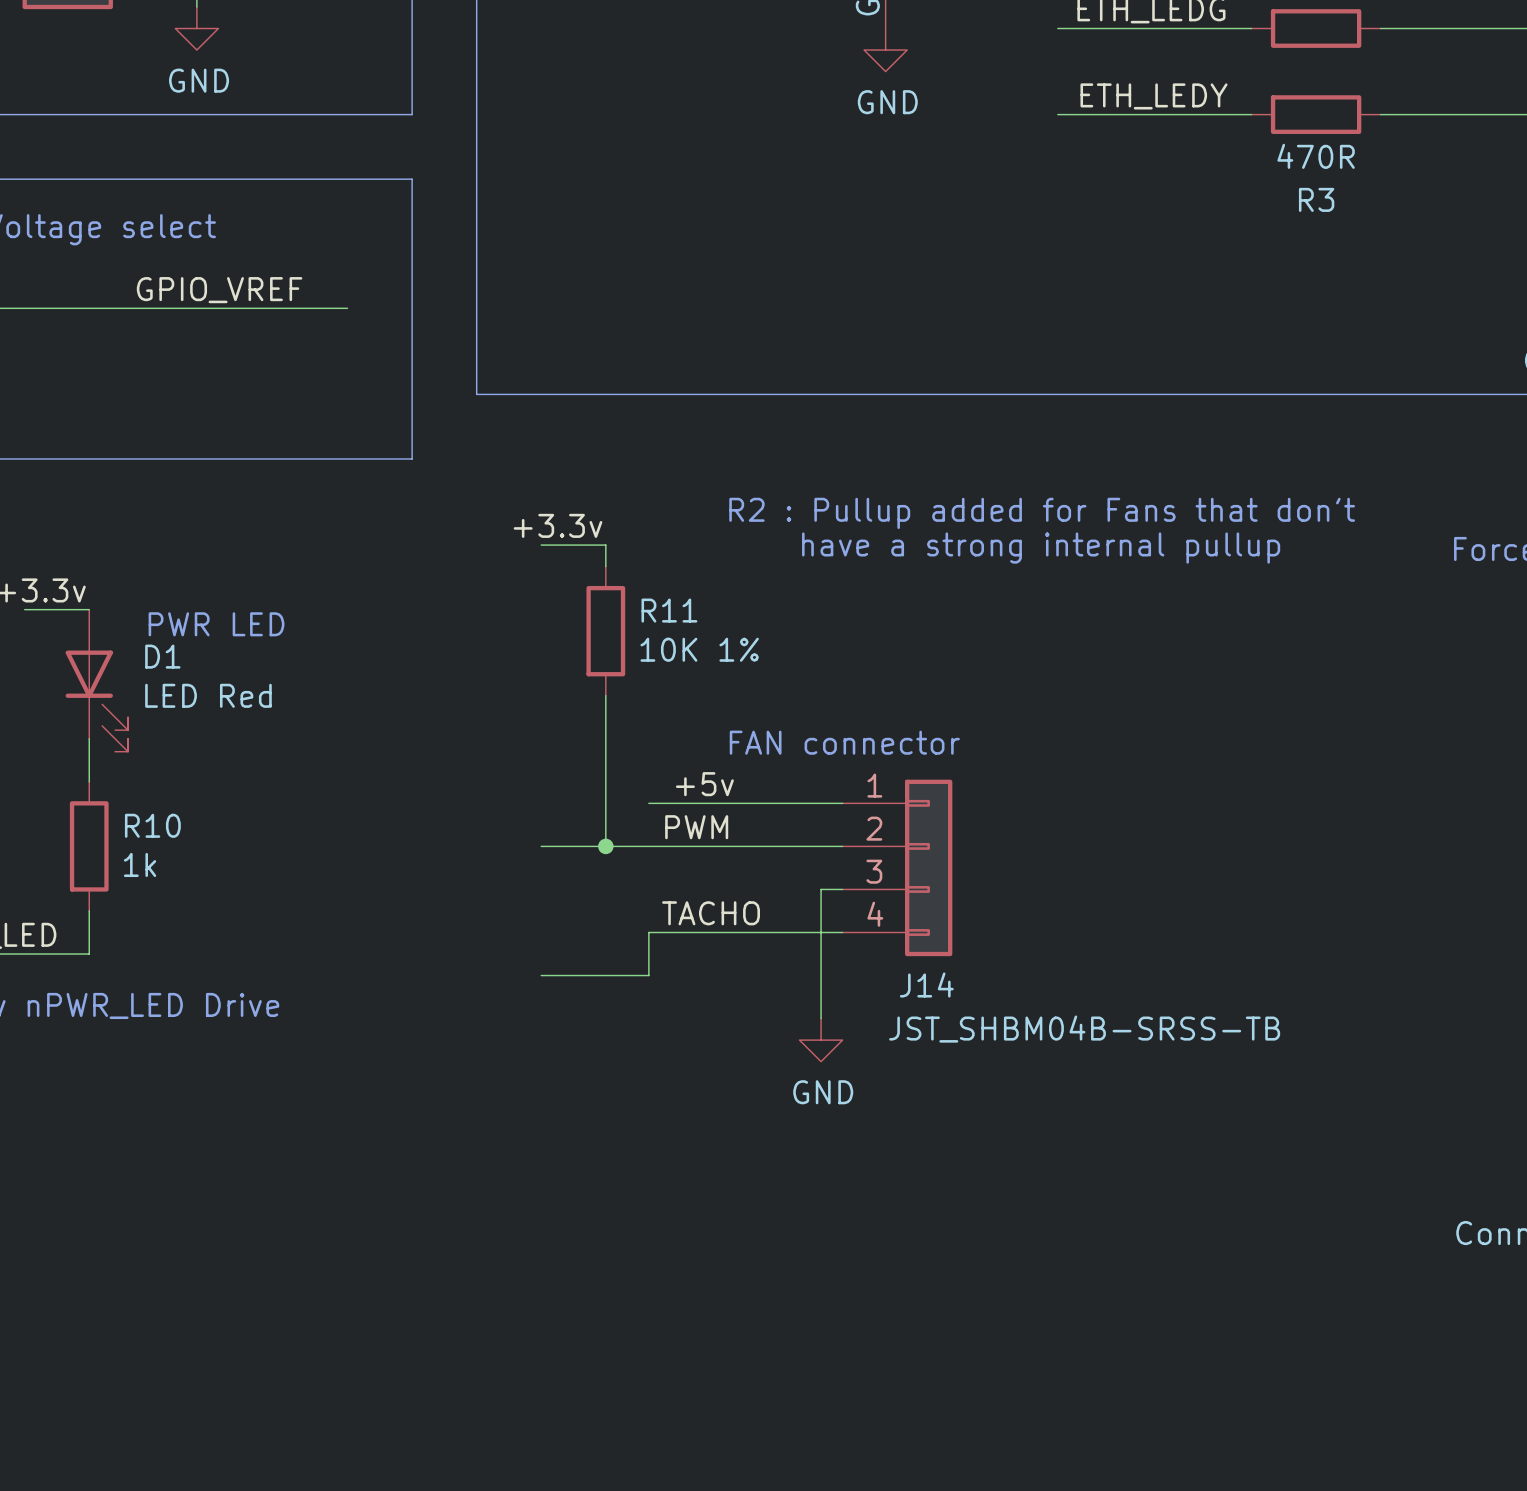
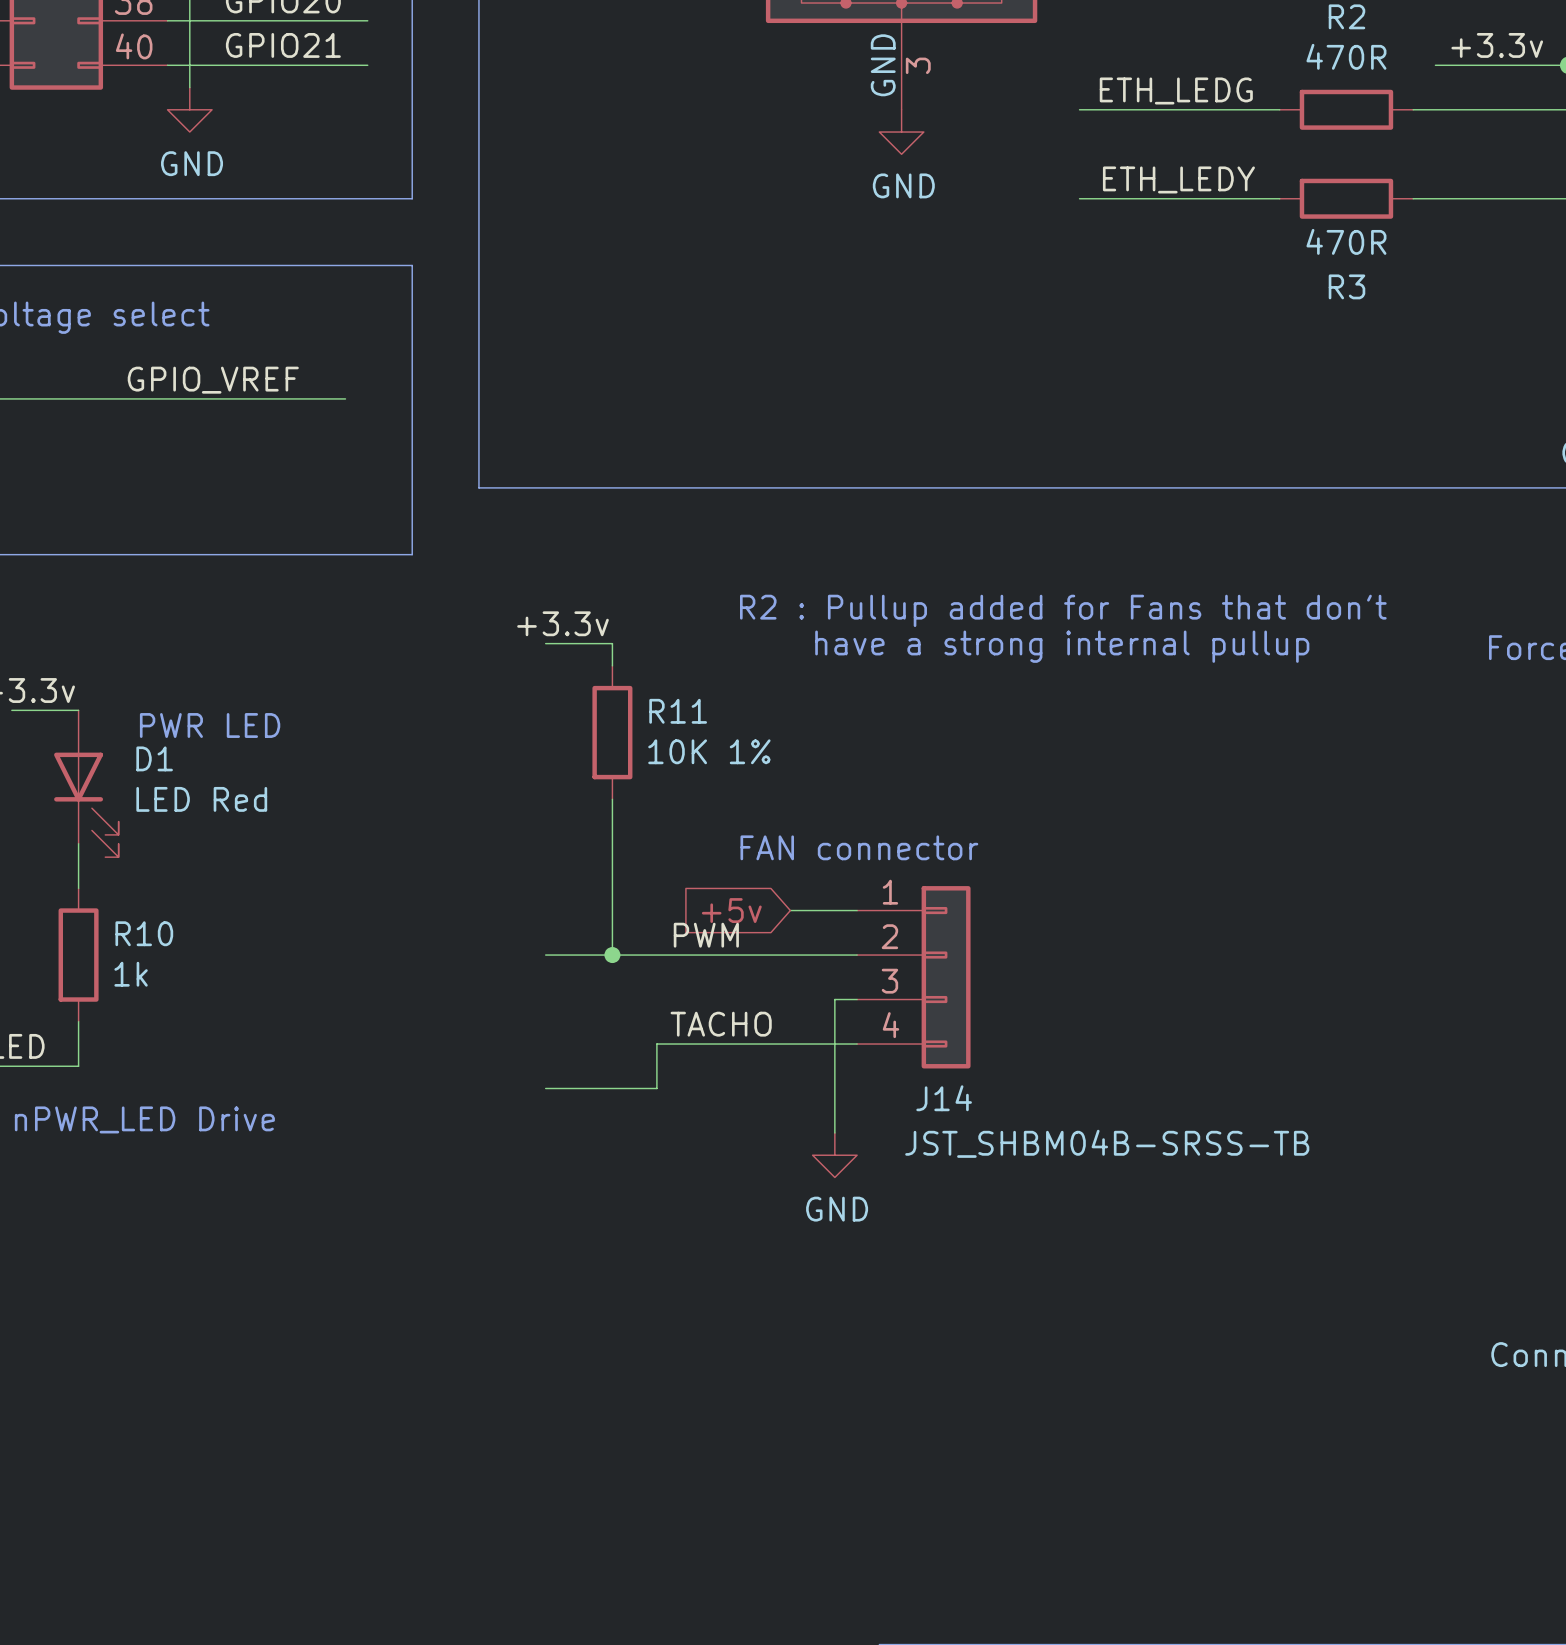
label: +5v (704, 784) -> none
wire: (648, 803) (778, 803) -> none
global label: none -> +5v (731, 910)

